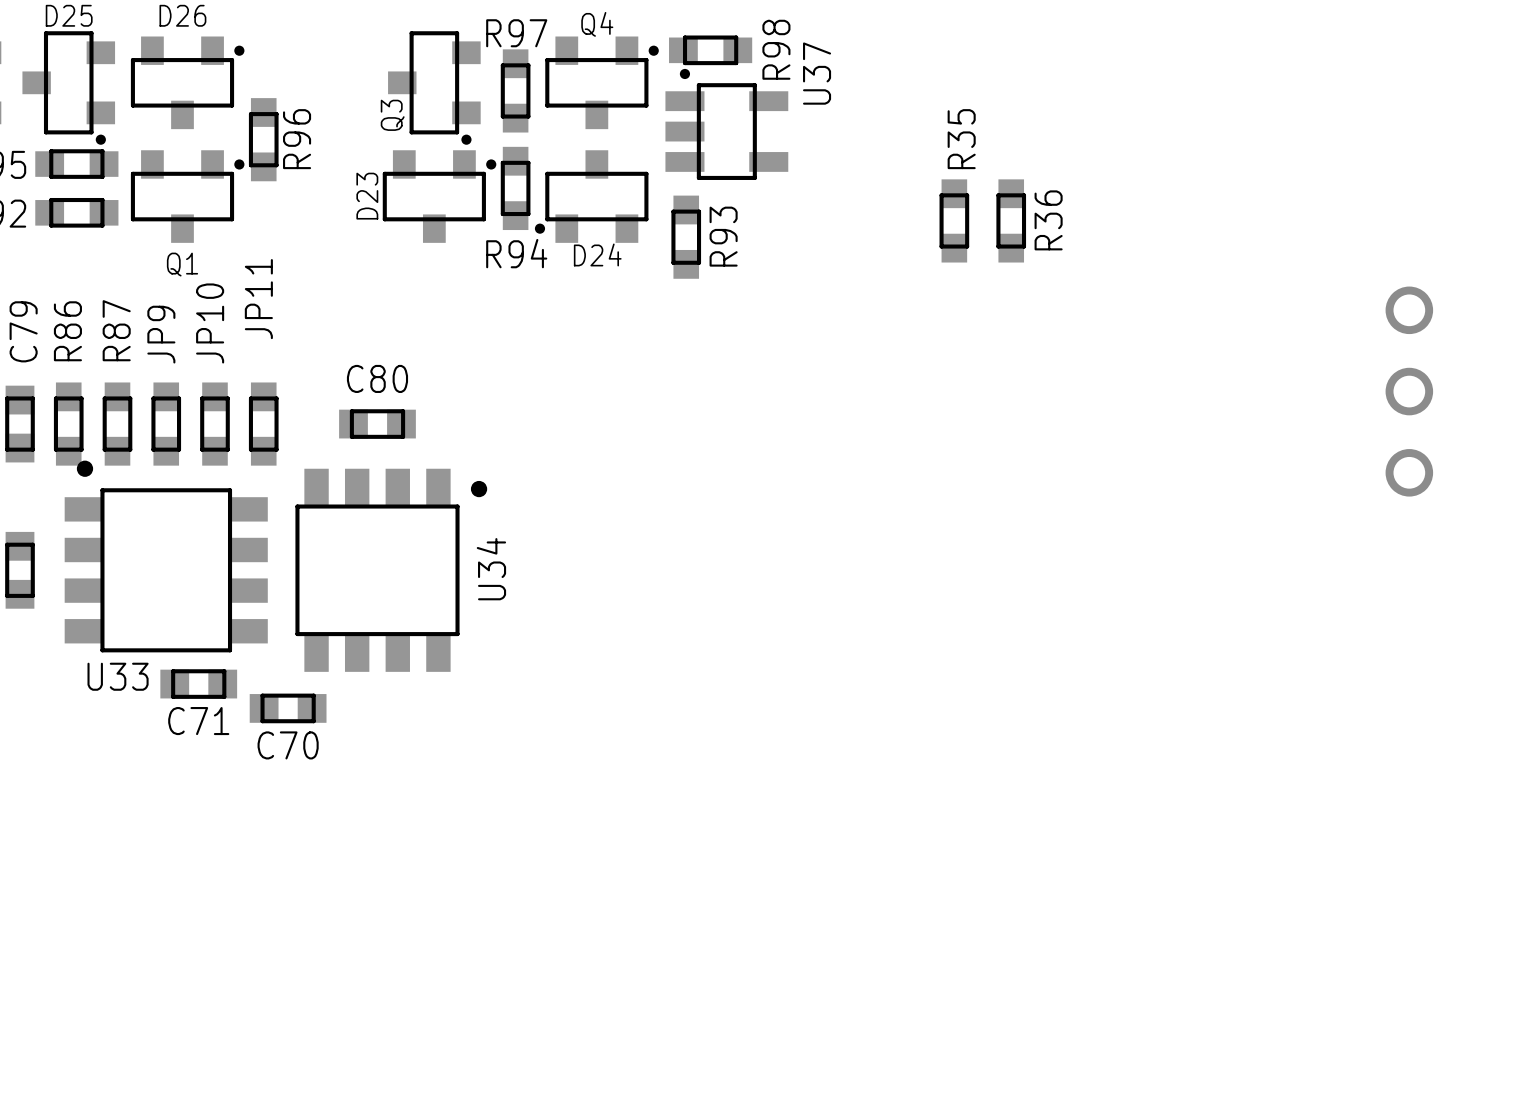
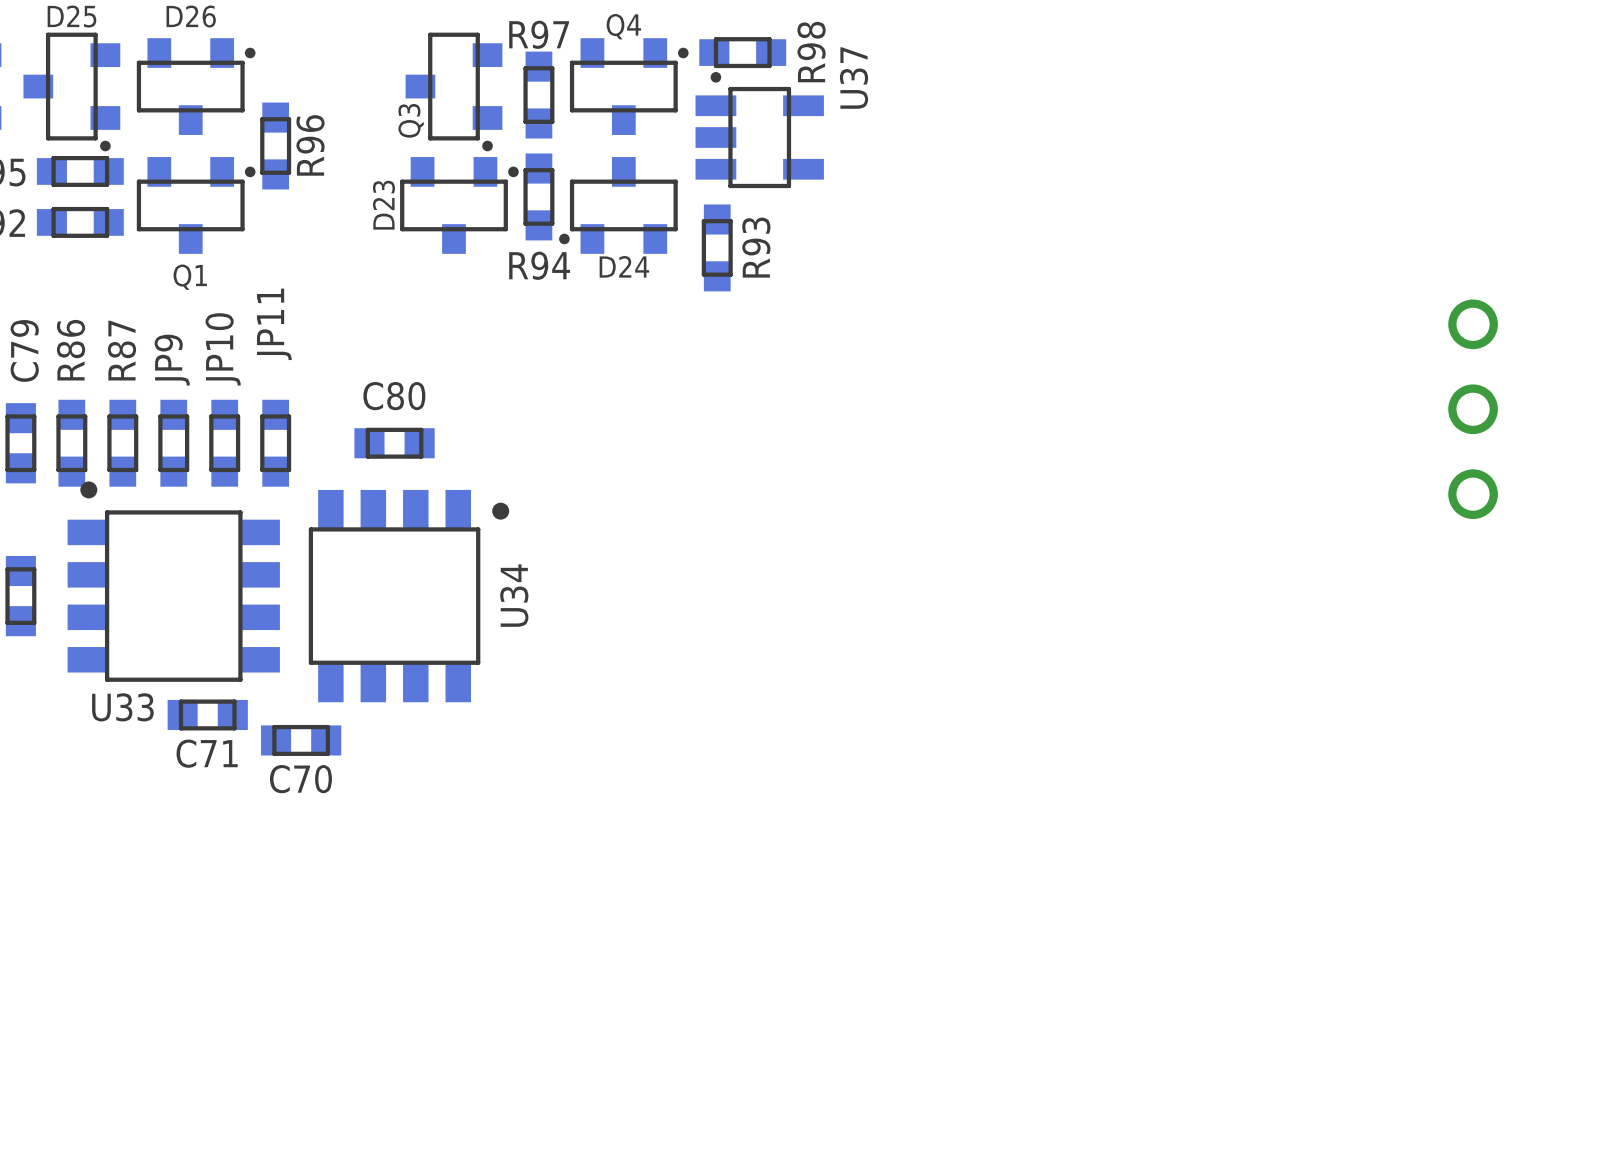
R35: (954, 220) -> none
R36: (1011, 220) -> none

